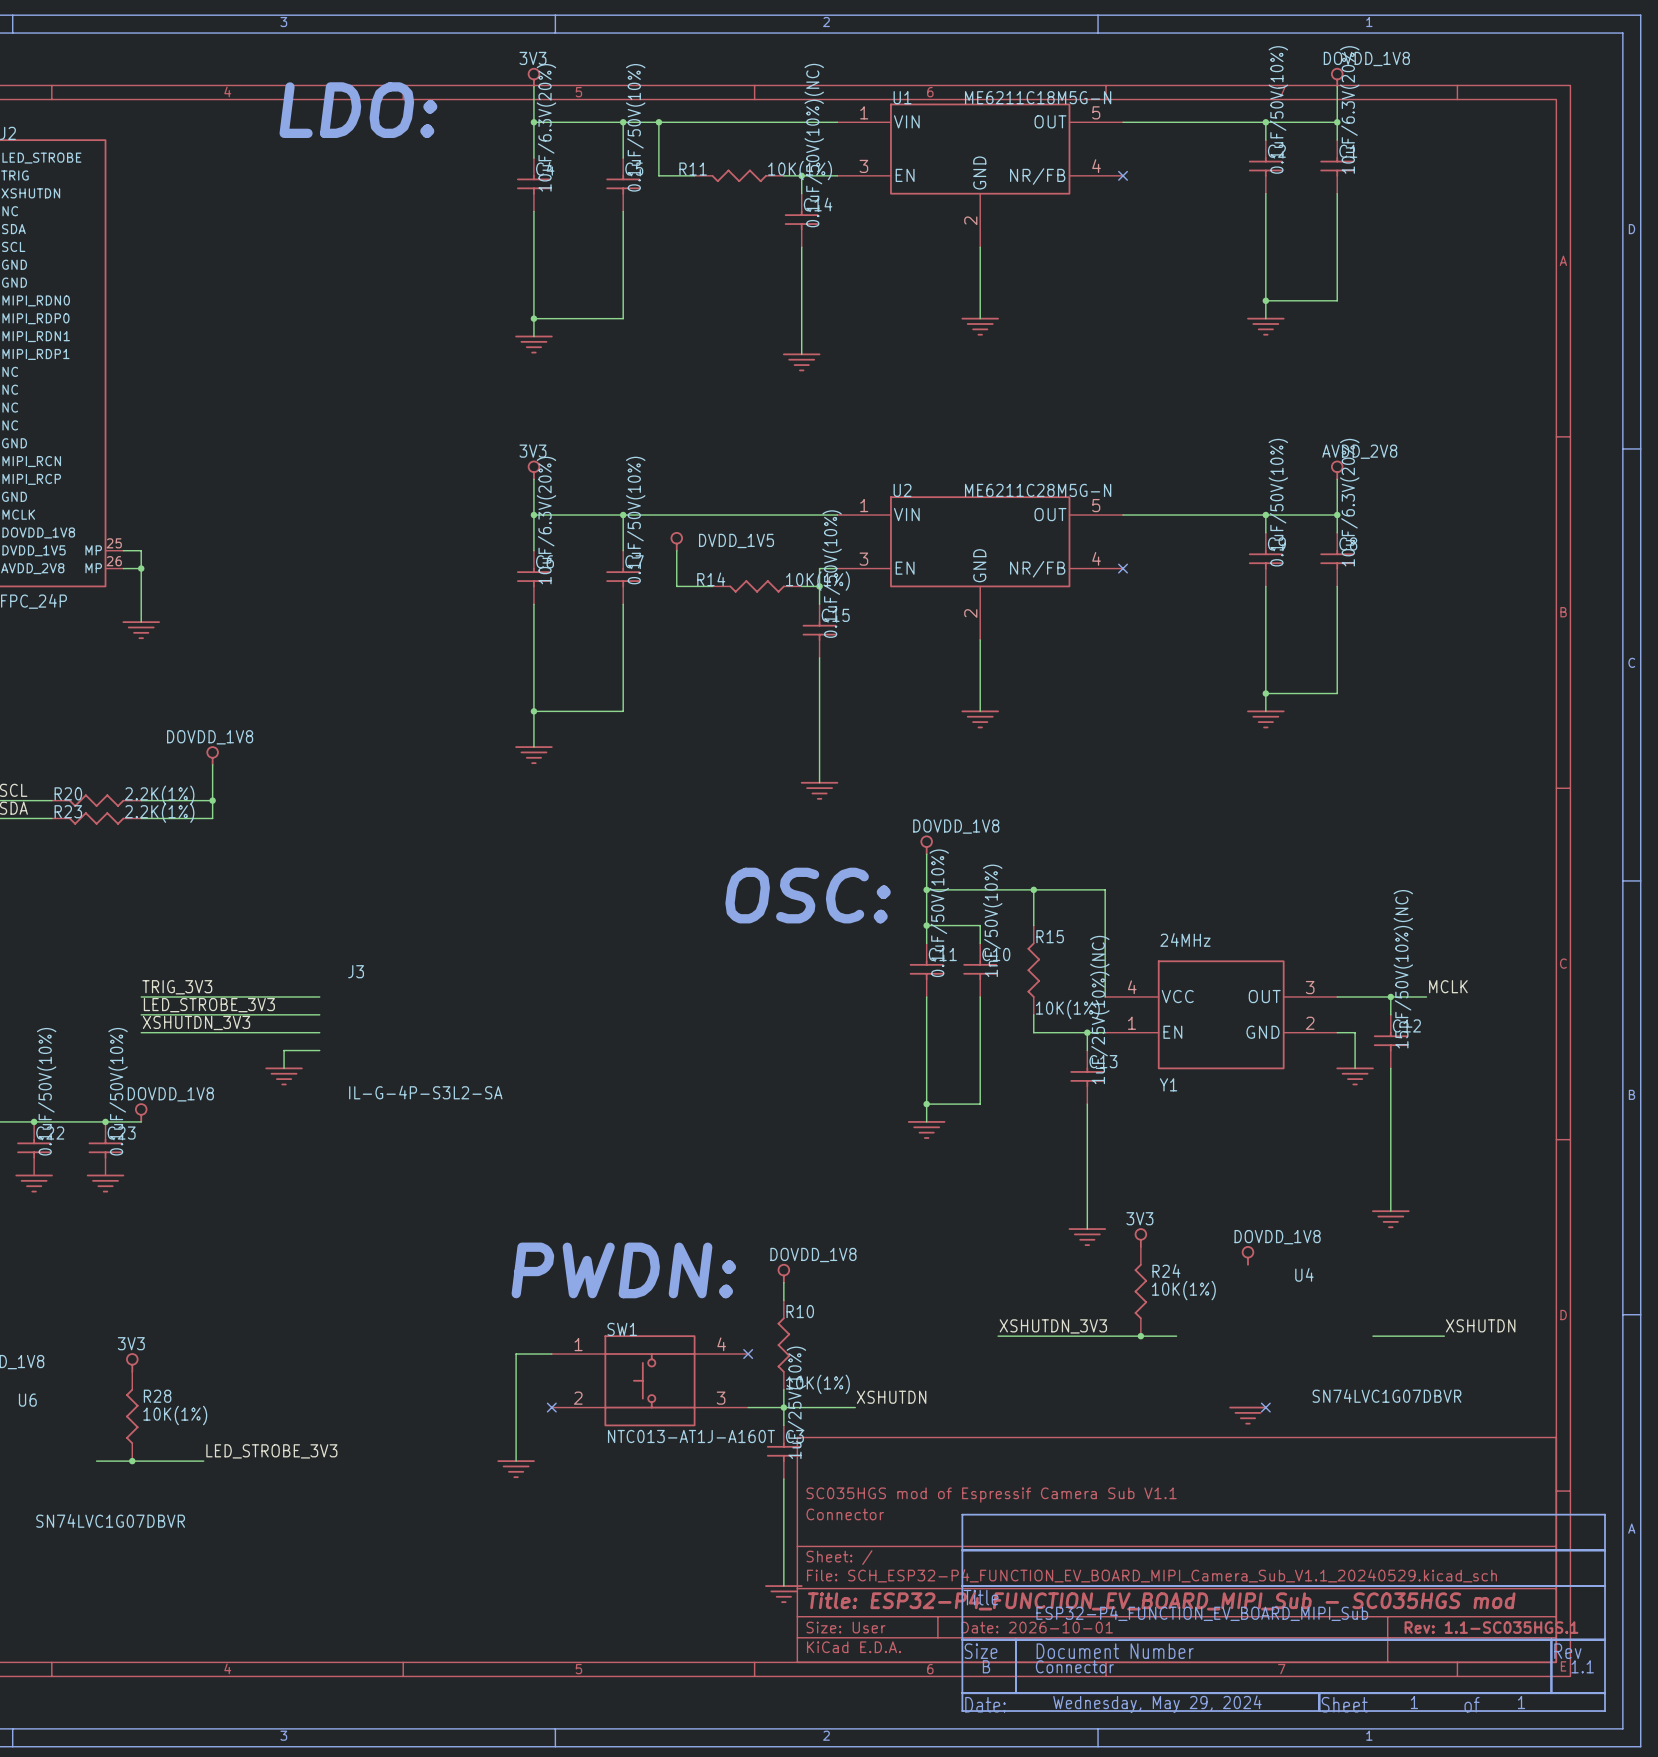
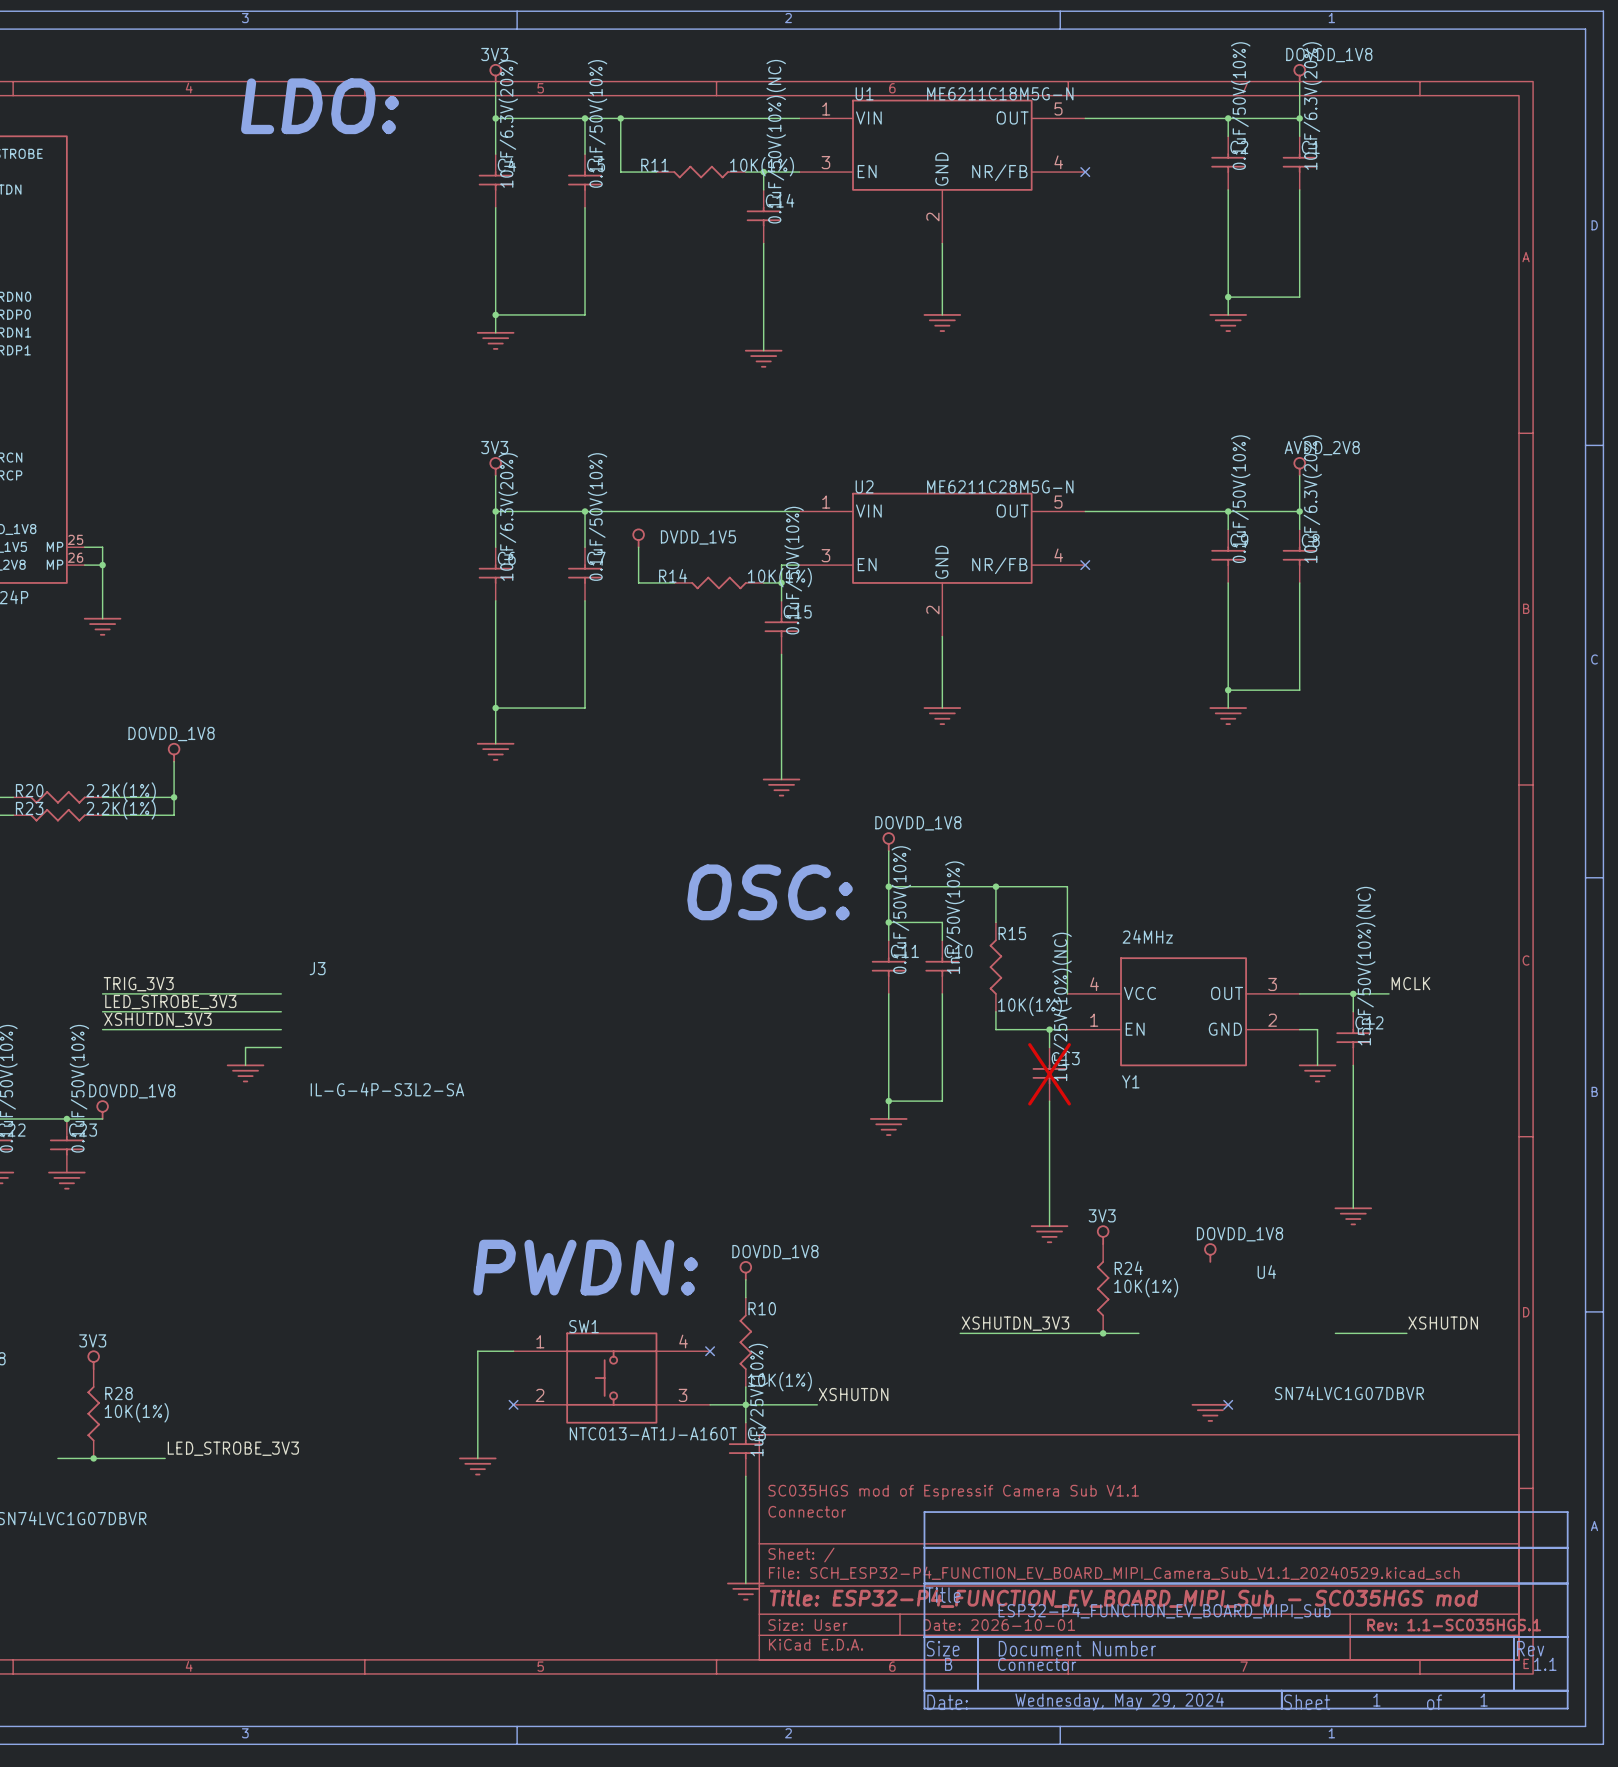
C13 do-not-place cross: none -> (1049, 1074)

